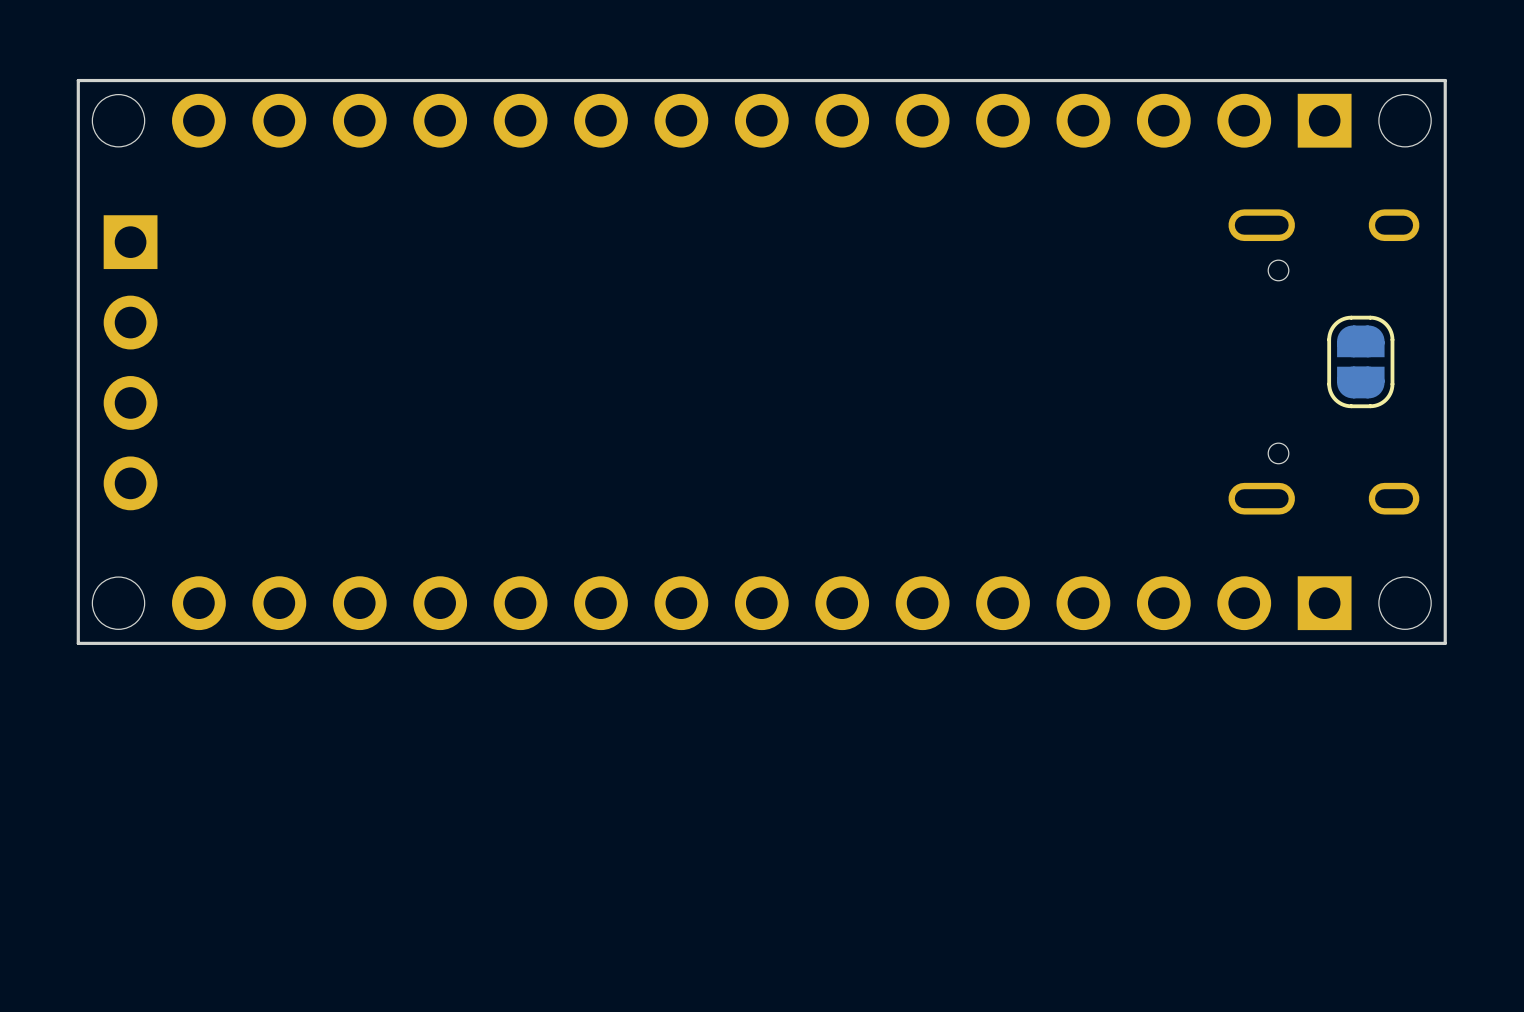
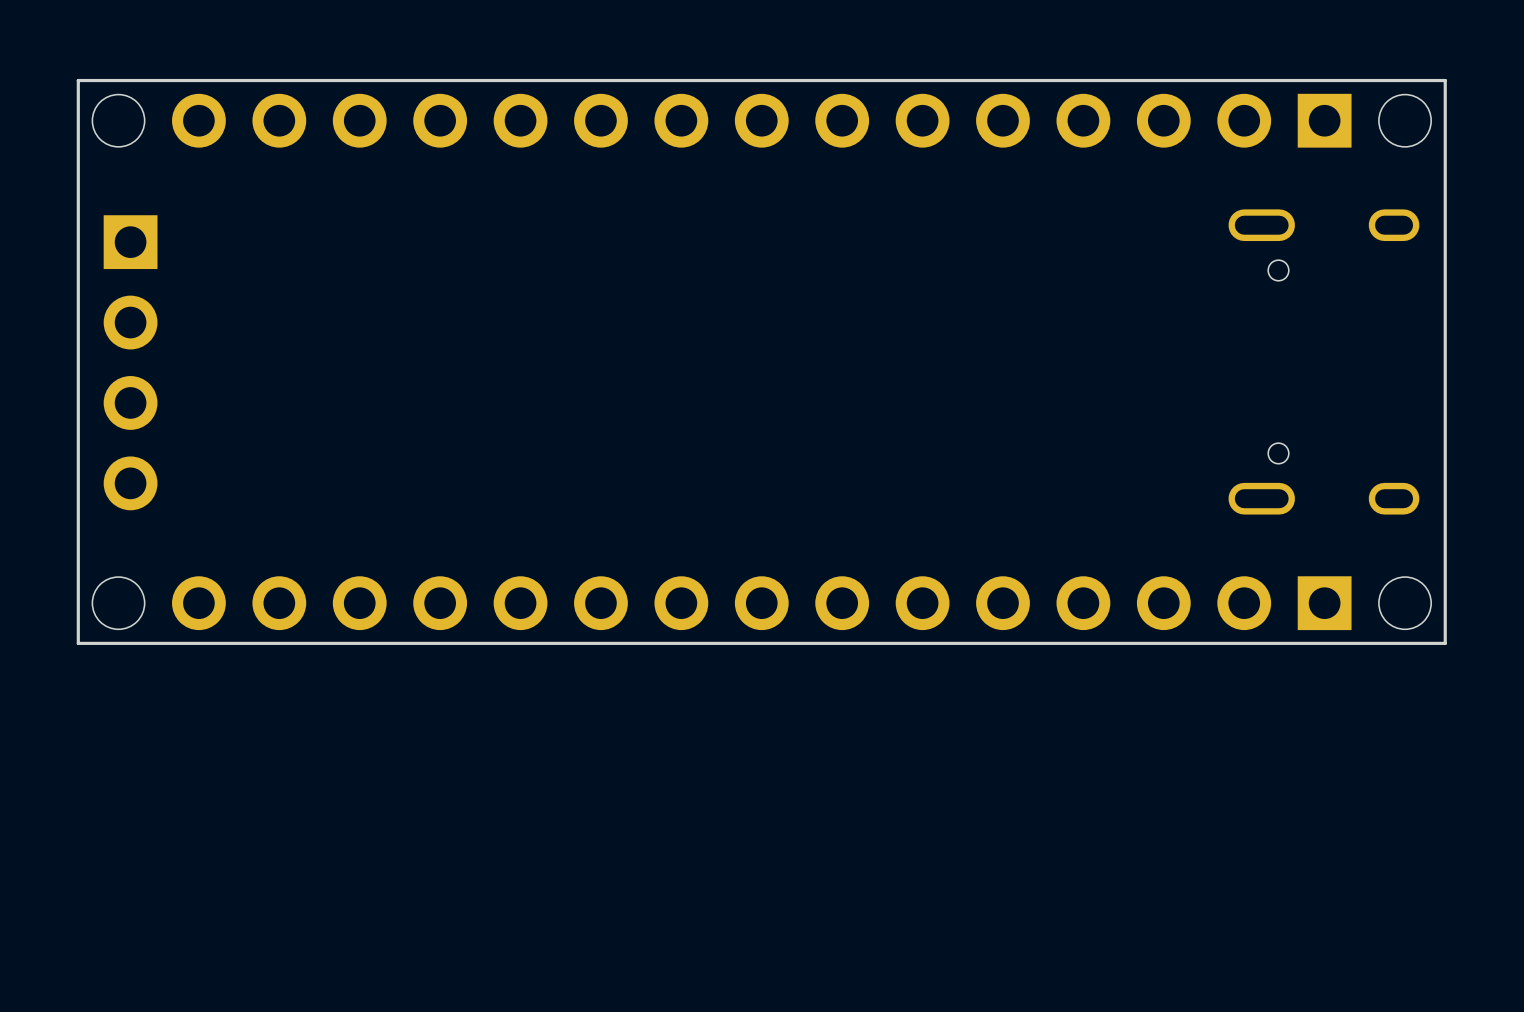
part: (1360, 361) -> none

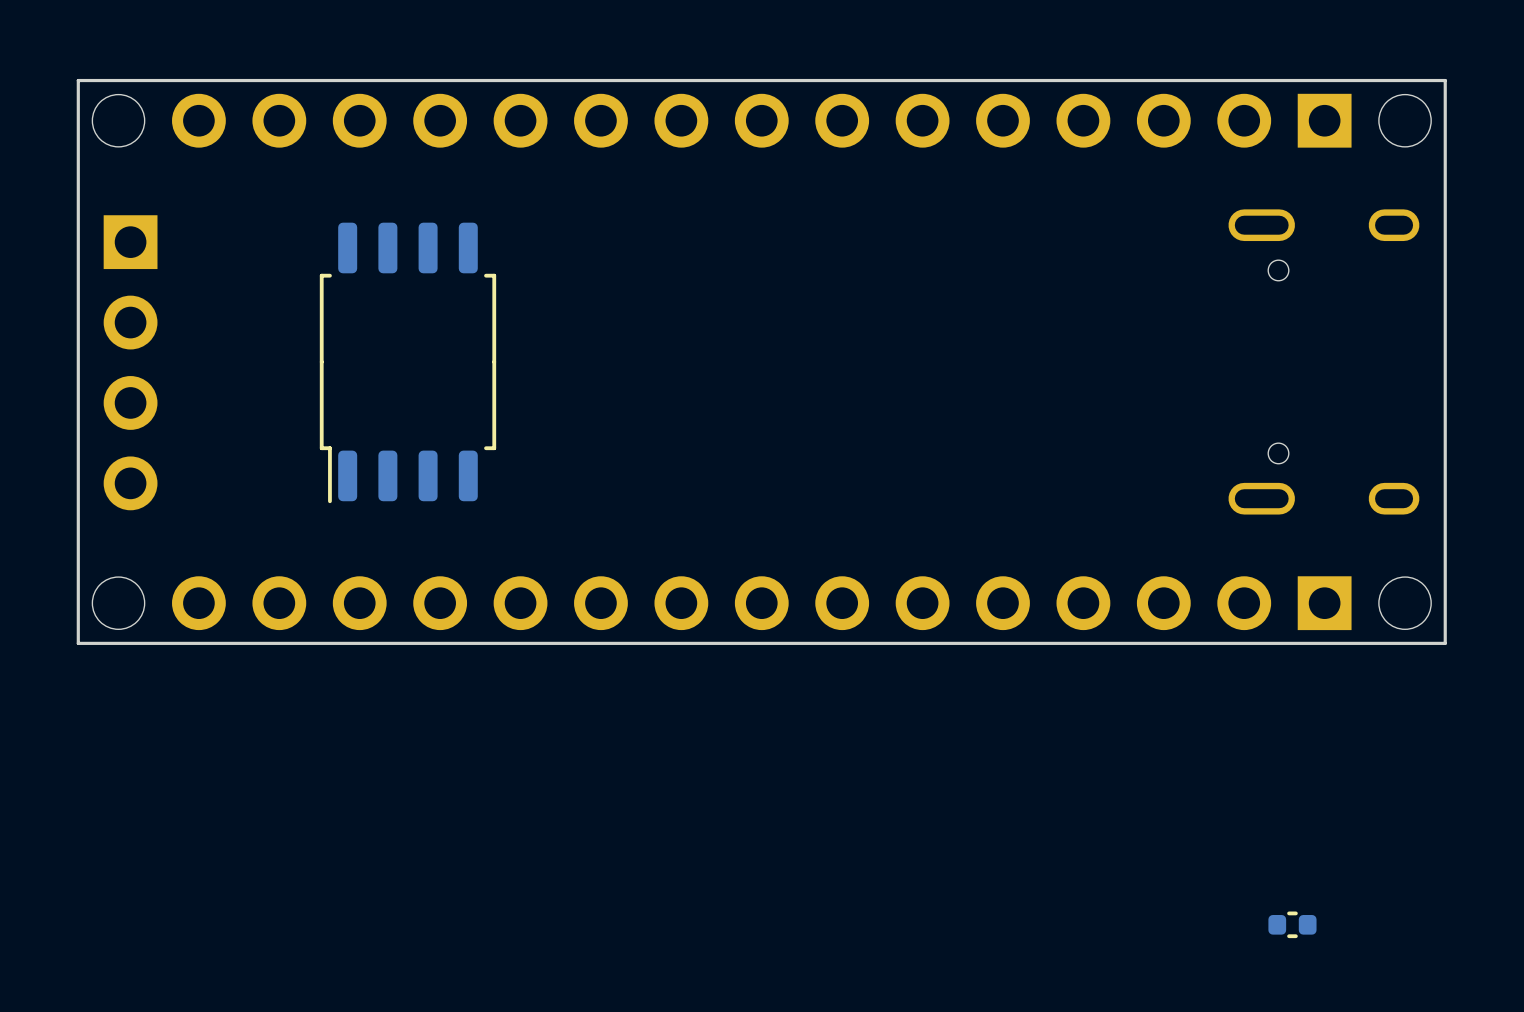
part: none -> (407, 362)
part: none -> (1292, 924)

